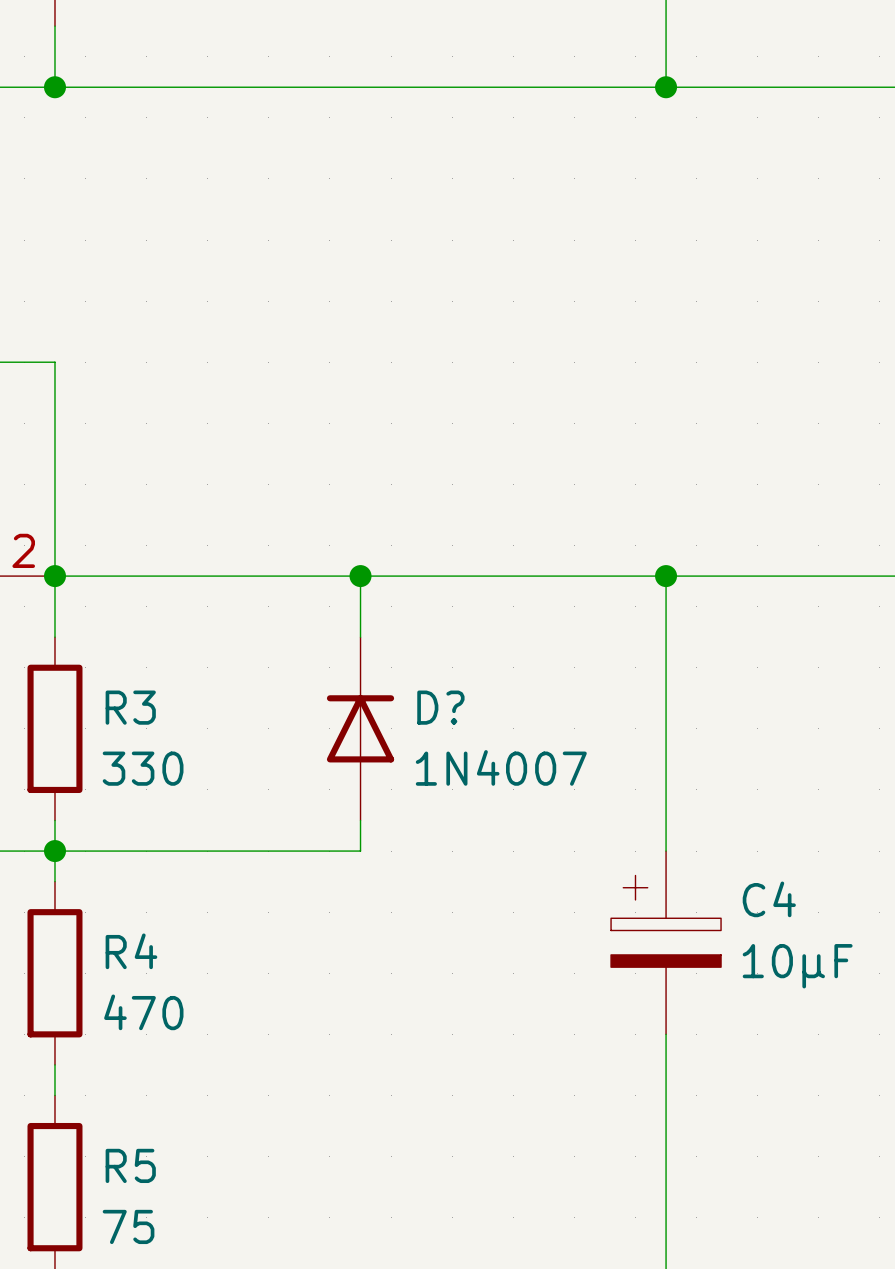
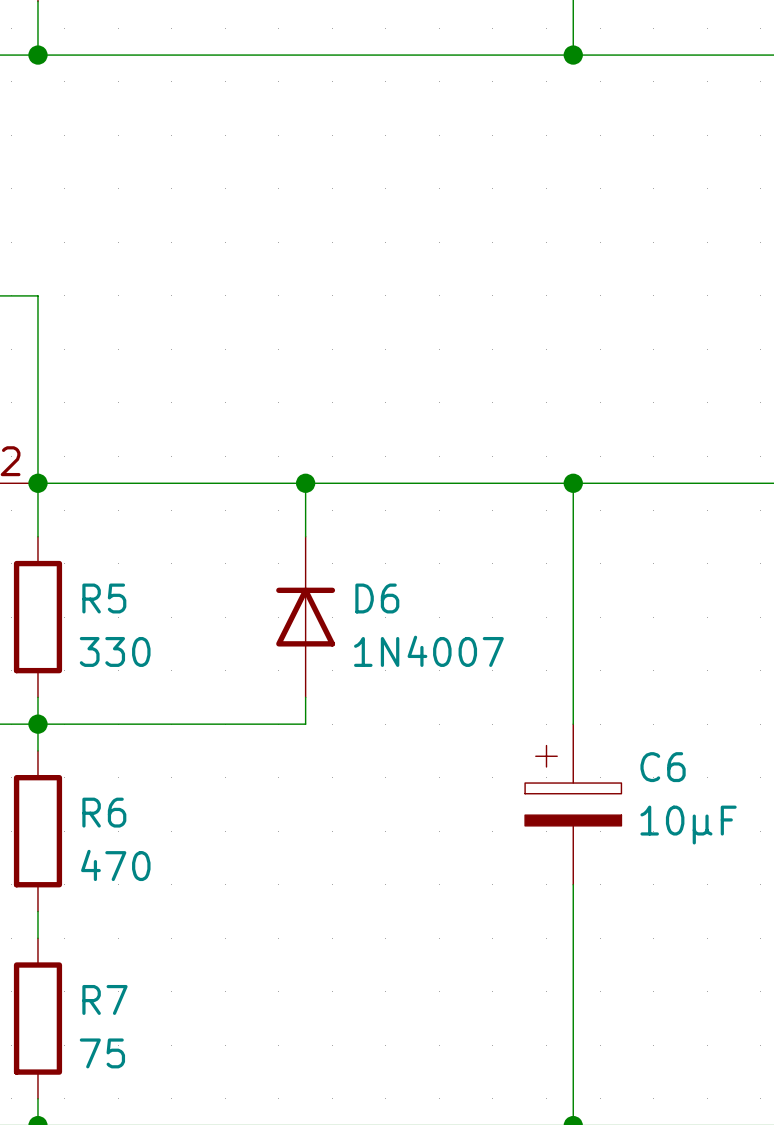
R3 name: R3 (130, 707) -> R5 (104, 598)
D? name: D? (440, 707) -> D6 (377, 598)
C4 name: C4 (769, 899) -> C6 (663, 767)
R4 name: R4 (131, 951) -> R6 (104, 812)
R5 name: R5 (130, 1165) -> R7 (104, 999)

